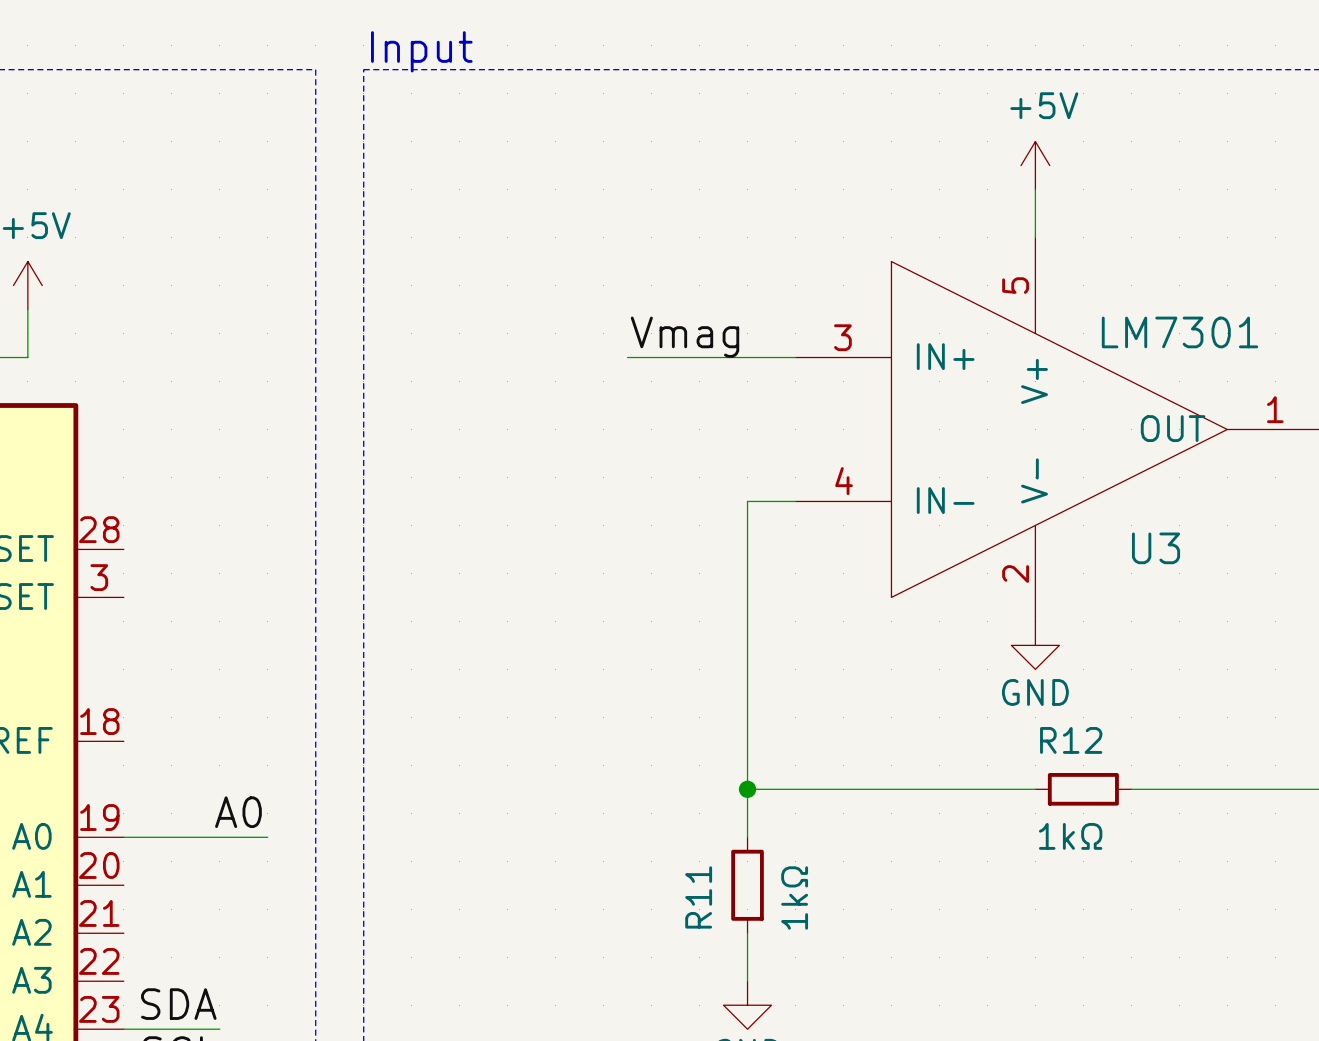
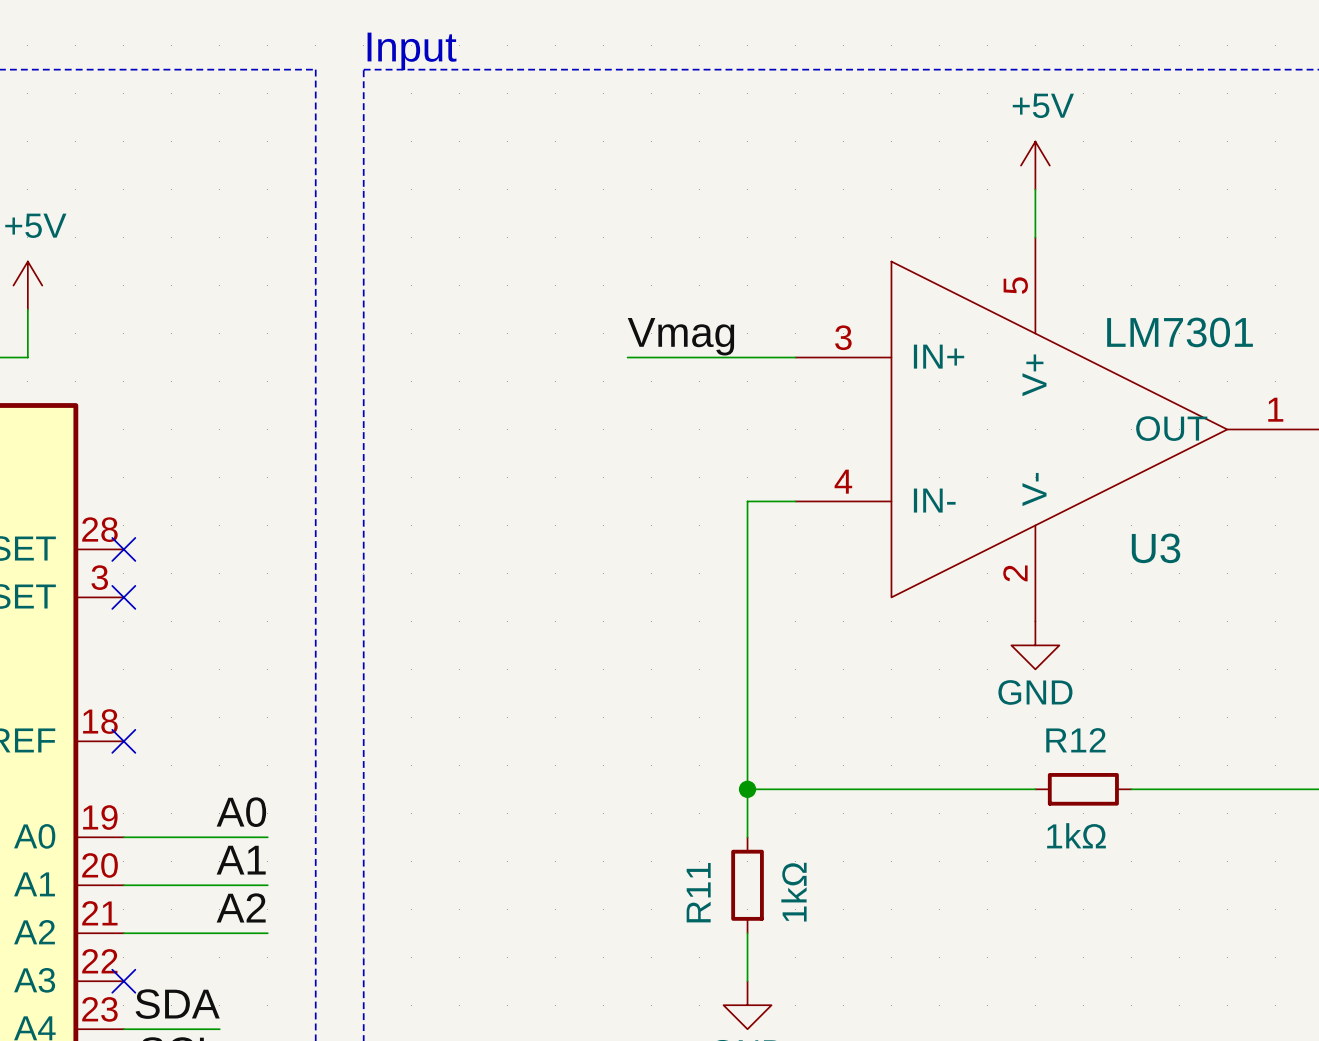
no-connect mark: none -> (123, 549)
no-connect mark: none -> (123, 597)
no-connect mark: none -> (123, 741)
label: none -> A1 (241, 860)
wire: none -> (123, 885) (267, 885)
label: none -> A2 (241, 907)
wire: none -> (123, 933) (267, 933)
no-connect mark: none -> (123, 981)

